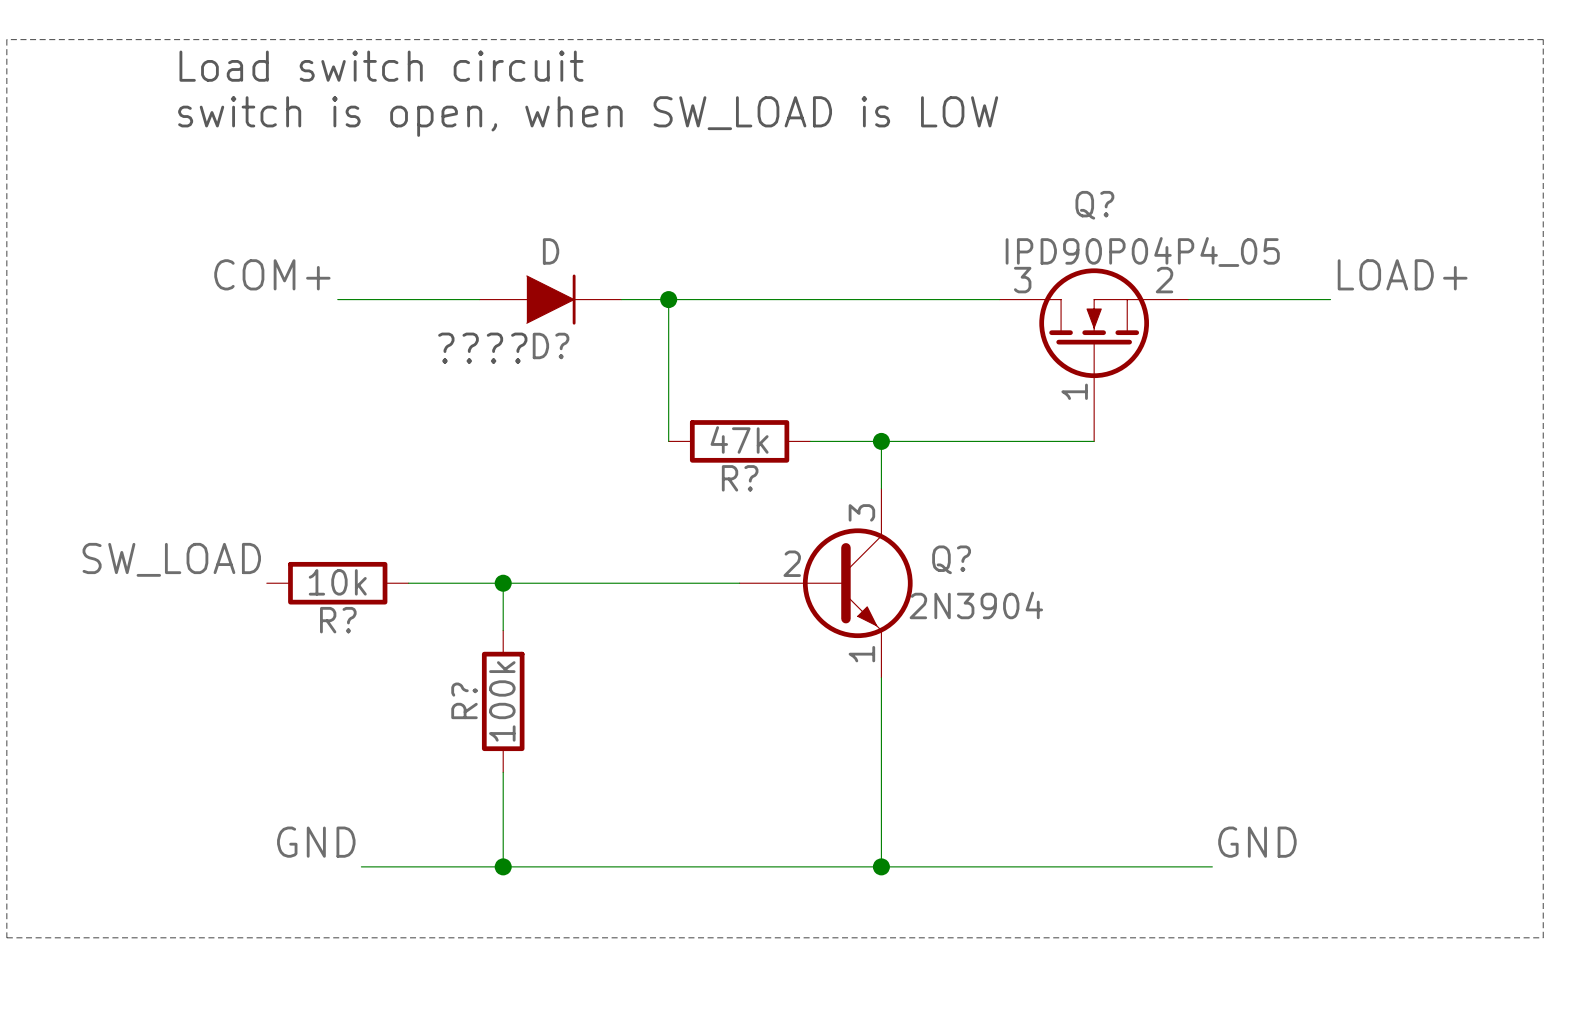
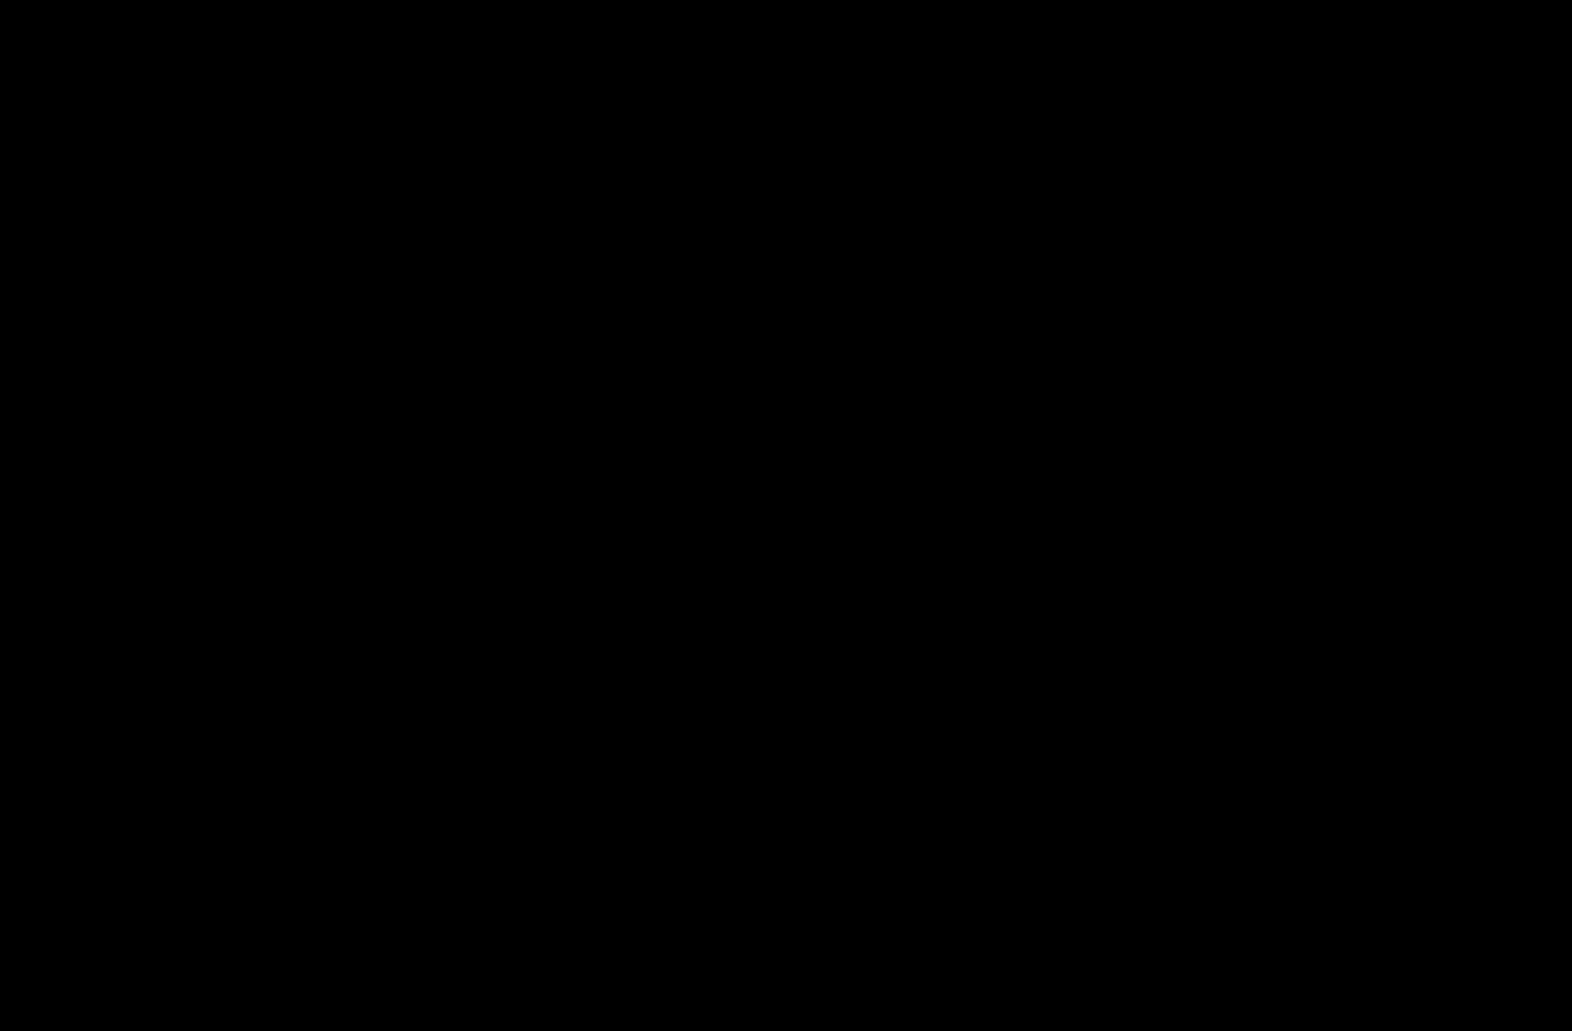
line: (6, 39) (6, 937) (1543, 937) (1543, 39) (6, 39) -> none
text: Load switch circuit (381, 66) -> none
text: switch is open, when SW_LOAD is LOW (588, 116) -> none
label: COM+ (272, 274) -> none
label: LOAD+ (1402, 274) -> none
wire: (337, 299) (479, 299) -> none
D?: D (550, 299) -> none
wire: (621, 299) (999, 299) -> none
wire: (668, 299) (668, 441) -> none
junction: (668, 299) -> none
wire: (1188, 299) (1330, 299) -> none
text: ???? (482, 348) -> none
Q?: IPD90P04P4_05 (1094, 354) -> none
R?: 47k (739, 441) -> none
wire: (810, 441) (1094, 441) -> none
wire: (881, 441) (881, 488) -> none
junction: (881, 441) -> none
label: SW_LOAD (171, 559) -> none
R?: 10k (337, 583) -> none
wire: (408, 583) (739, 583) -> none
wire: (503, 583) (503, 630) -> none
junction: (503, 583) -> none
Q?: 2N3904 (826, 583) -> none
wire: (881, 677) (881, 866) -> none
R?: 100k (503, 701) -> none
wire: (503, 772) (503, 866) -> none
label: GND (316, 842) -> none
label: GND (1257, 842) -> none
wire: (361, 866) (1212, 866) -> none
junction: (503, 866) -> none
junction: (881, 866) -> none

